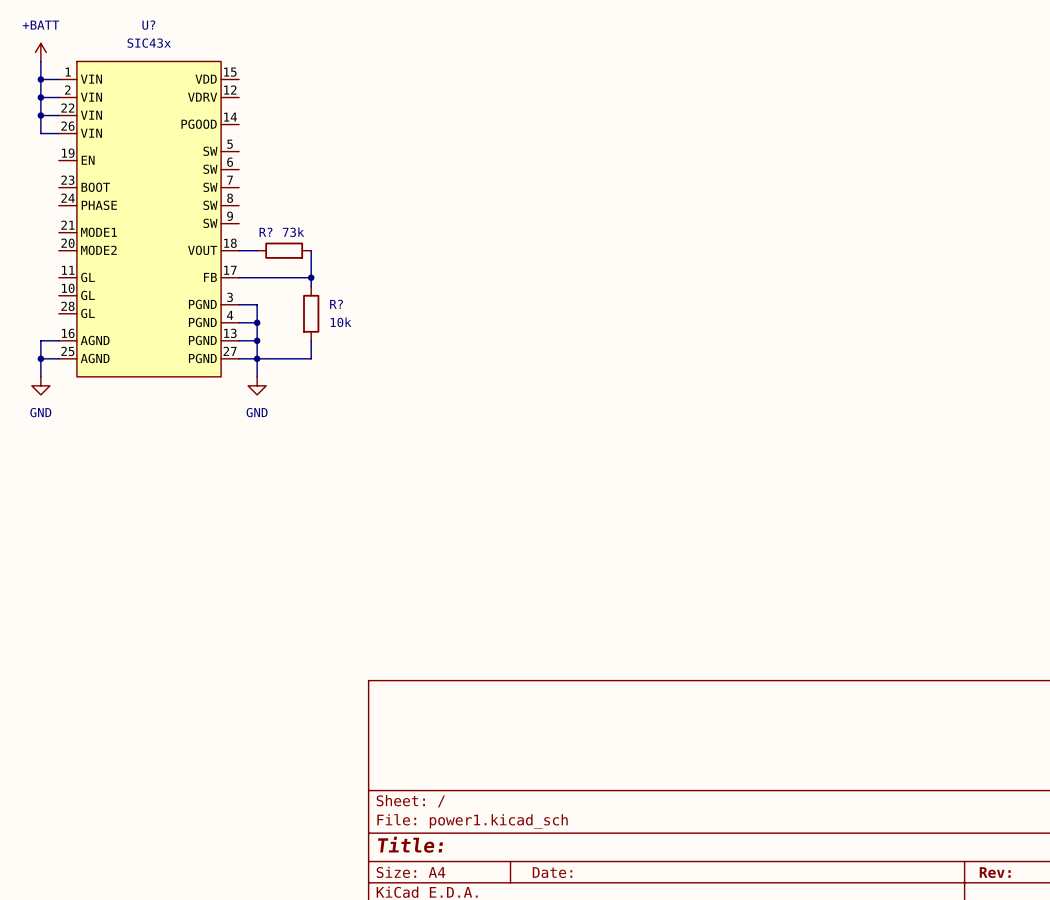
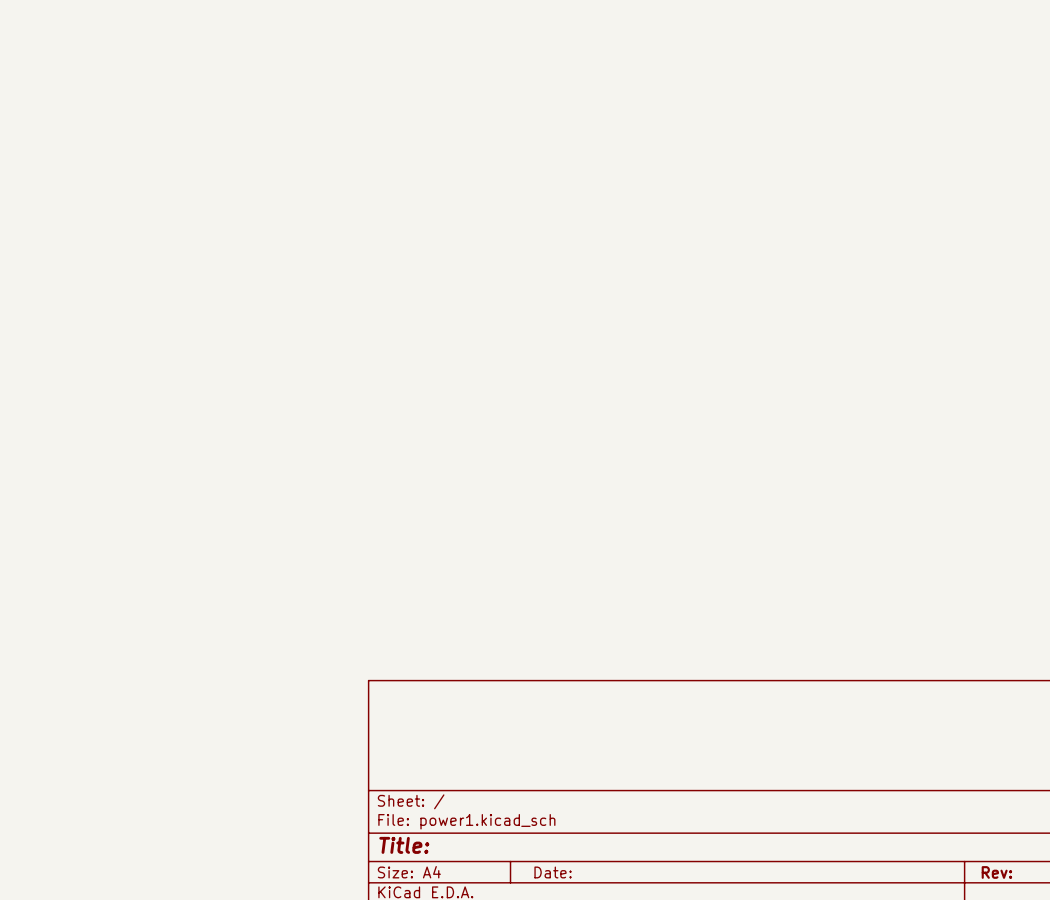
power symbol: +BATT (40, 52) -> none
wire: (40, 61) (40, 133) (58, 133) -> none
wire: (40, 79) (58, 79) -> none
junction: (40, 79) -> none
wire: (40, 97) (58, 97) -> none
junction: (40, 97) -> none
wire: (40, 115) (58, 115) -> none
junction: (40, 115) -> none
U?: SIC43x (149, 219) -> none
wire: (239, 250) (257, 250) -> none
R?: 73k (284, 250) -> none
wire: (311, 250) (311, 286) -> none
wire: (239, 277) (311, 277) -> none
junction: (311, 277) -> none
wire: (239, 304) (257, 304) (257, 376) -> none
R?: 10k (311, 313) -> none
wire: (239, 322) (257, 322) -> none
junction: (257, 322) -> none
wire: (58, 340) (40, 340) (40, 376) -> none
wire: (239, 340) (257, 340) -> none
junction: (257, 340) -> none
wire: (311, 340) (311, 358) (239, 358) -> none
wire: (40, 358) (58, 358) -> none
junction: (40, 358) -> none
junction: (257, 358) -> none
power symbol: GND (40, 385) -> none
power symbol: GND (257, 385) -> none

